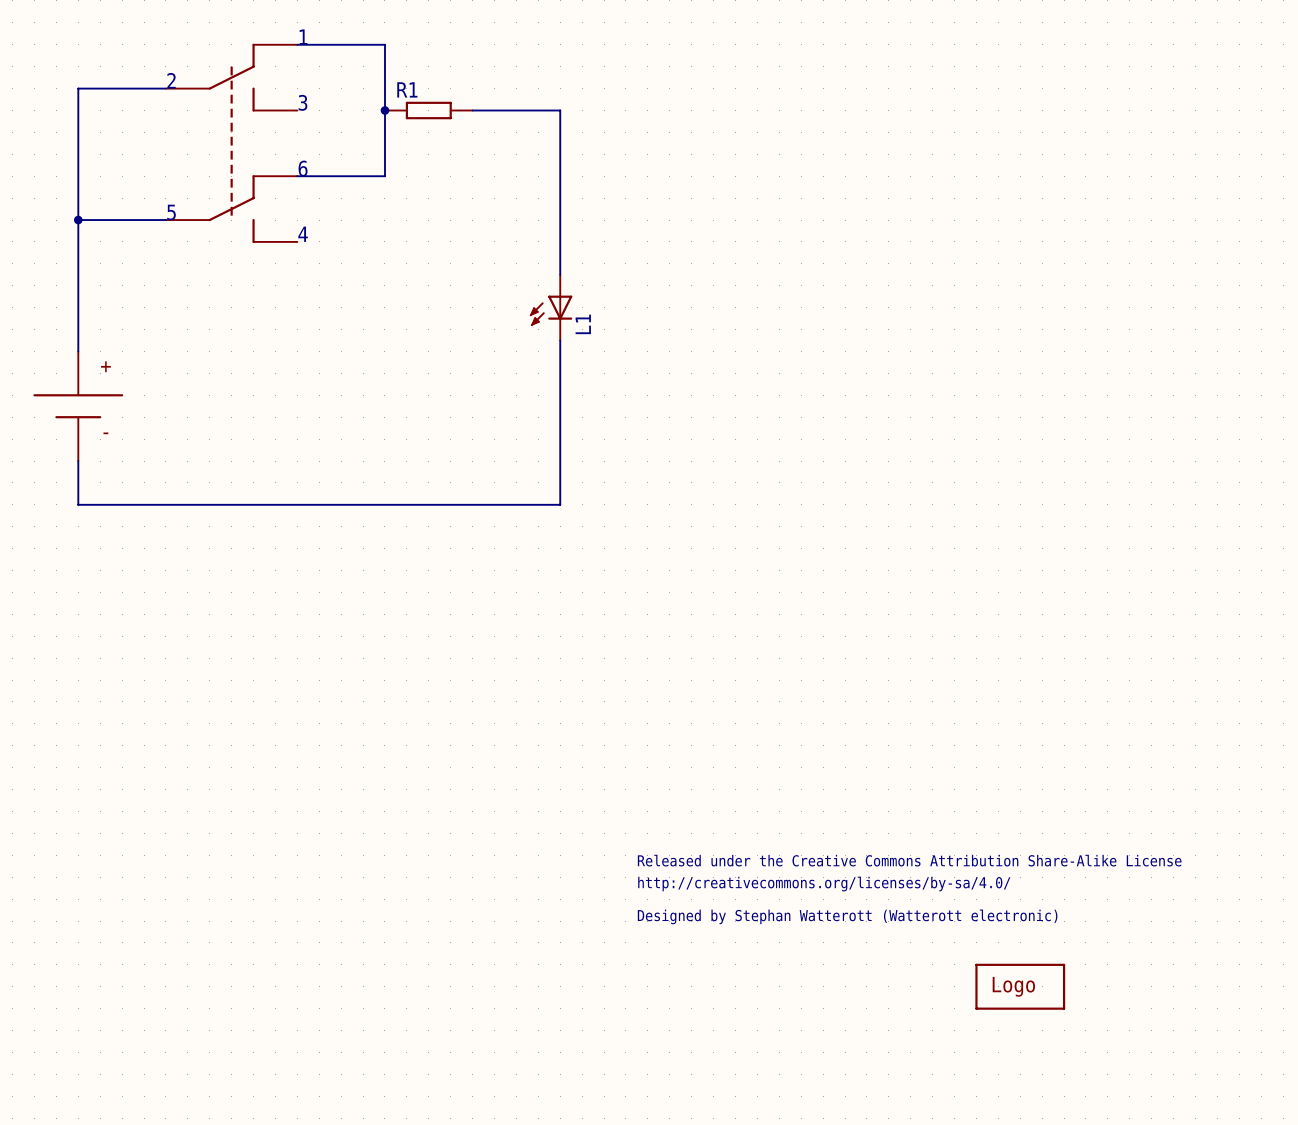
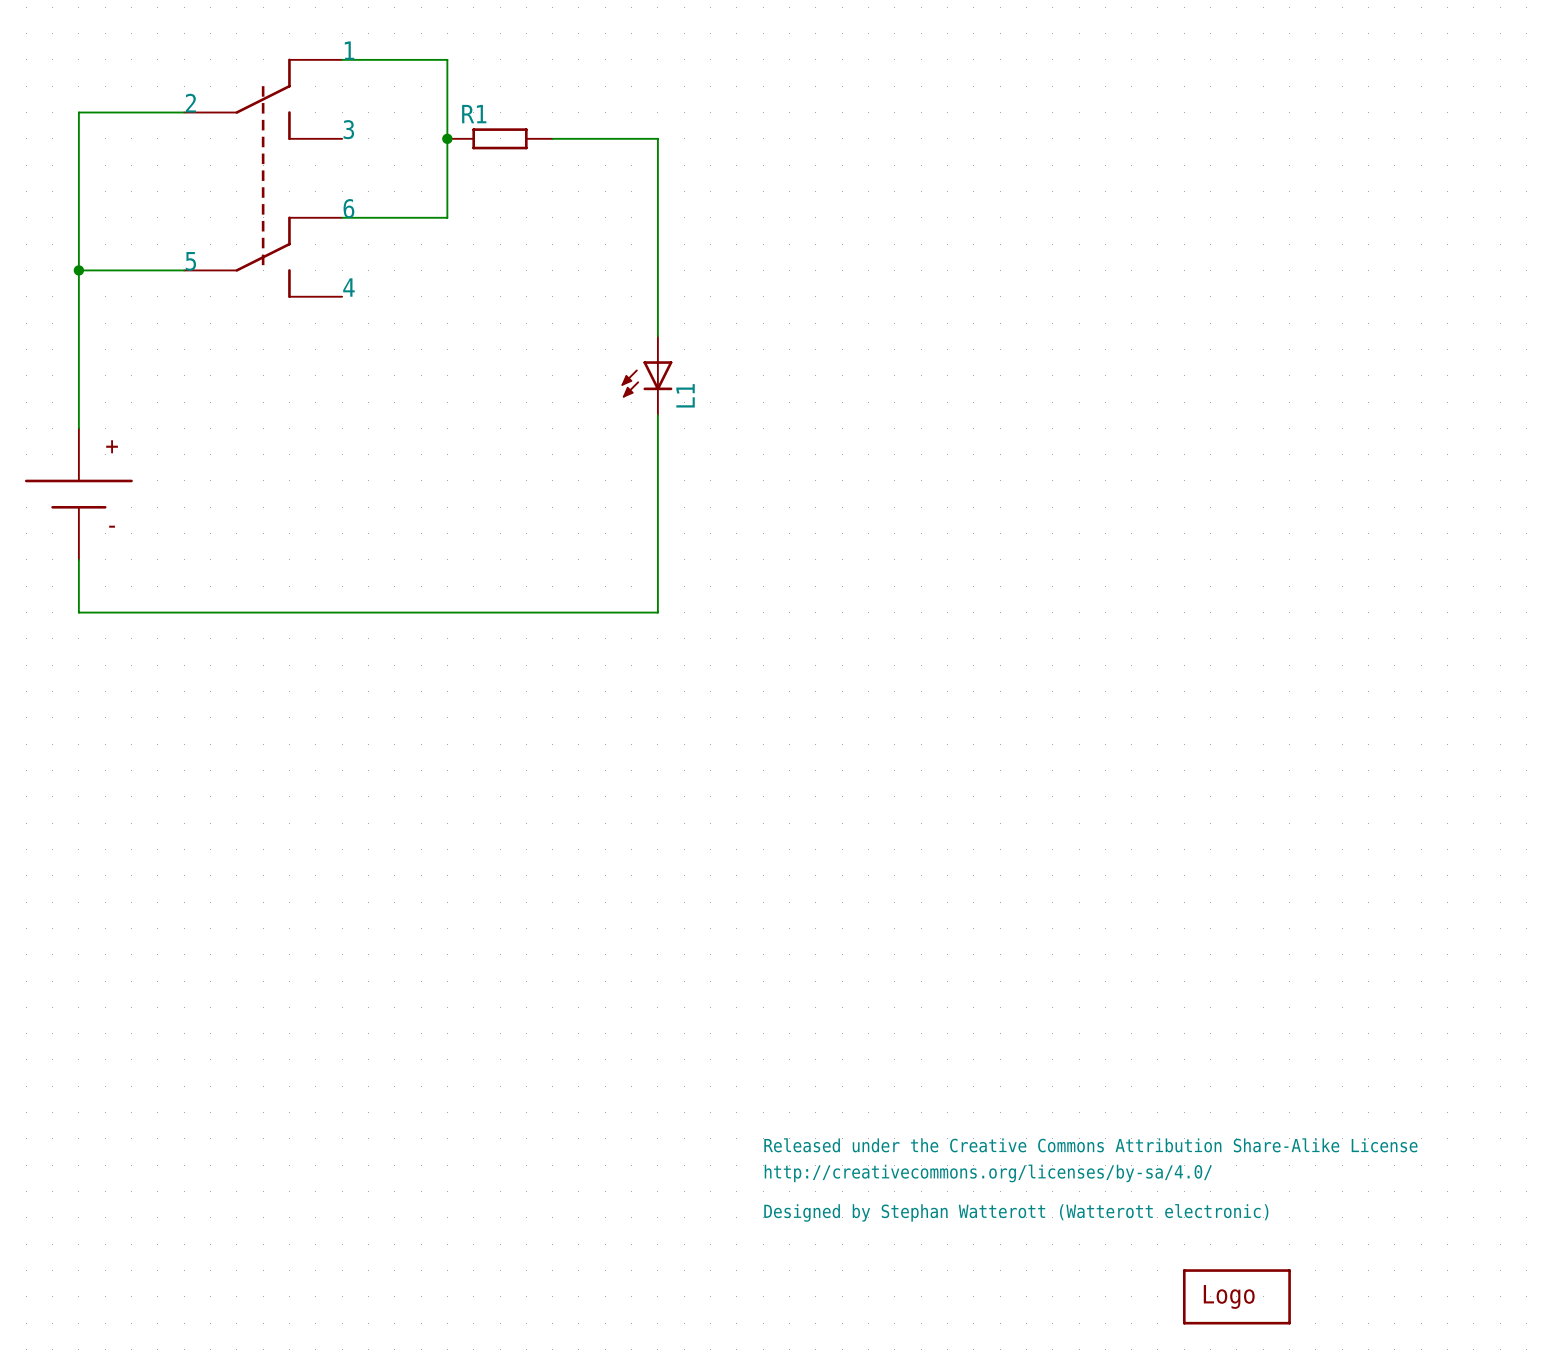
text position: Released under the Creative Commons Attribution Share-Alike License (909, 860) -> Released under the Creative Commons Attribution Share-Alike License (1090, 1145)
text position: http://creativecommons.org/licenses/by-sa/4.0/ (824, 884) -> http://creativecommons.org/licenses/by-sa/4.0/ (988, 1173)
text position: Designed by Stephan Watterott (Watterott electronic) (847, 916) -> Designed by Stephan Watterott (Watterott electronic) (1016, 1212)
part position: (1020, 986) -> (1236, 1296)

